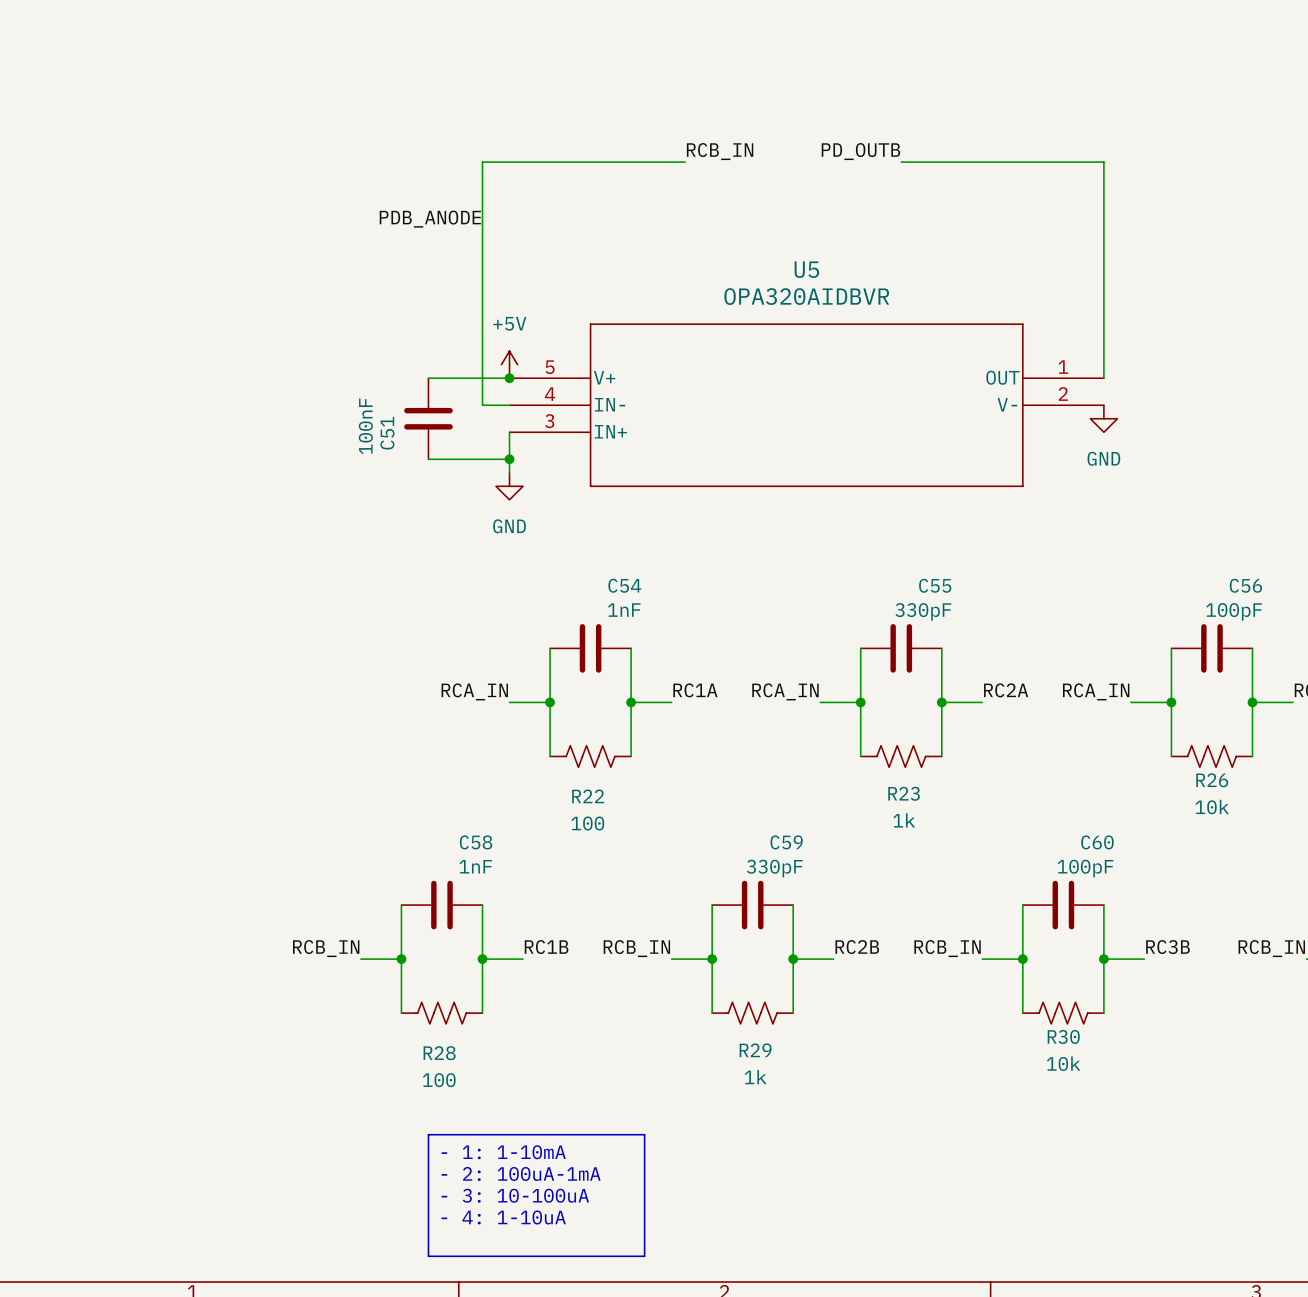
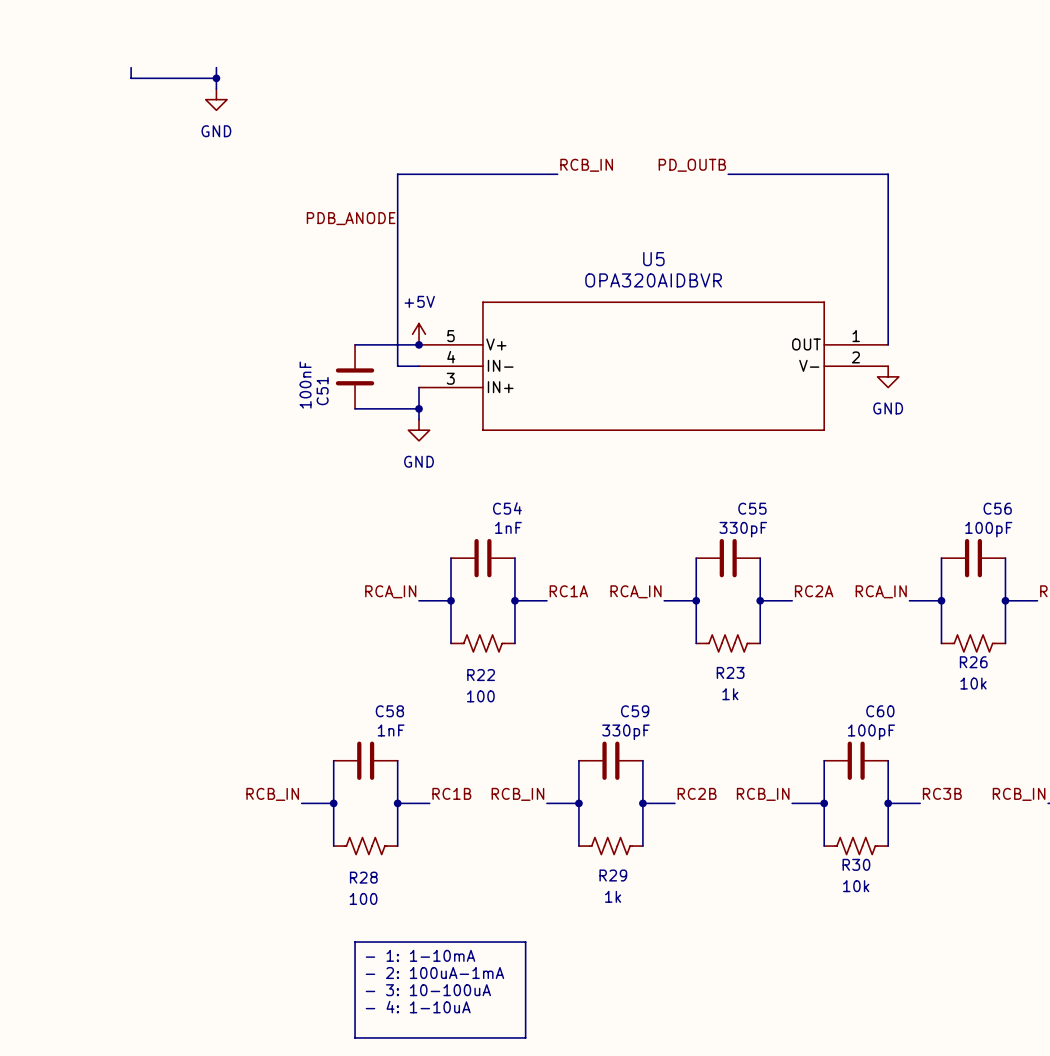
wire: none -> (131, 67) (131, 78) (216, 78)
wire: none -> (216, 67) (216, 88)
junction: none -> (216, 78)
power symbol: none -> GND (216, 99)

